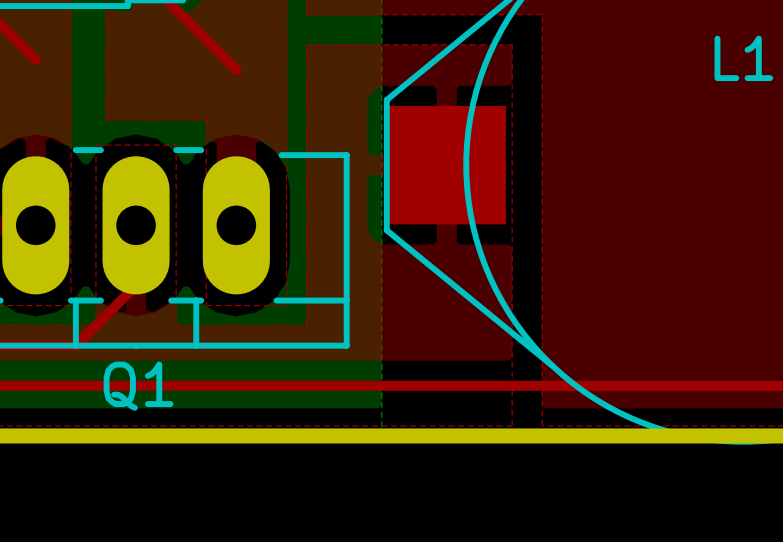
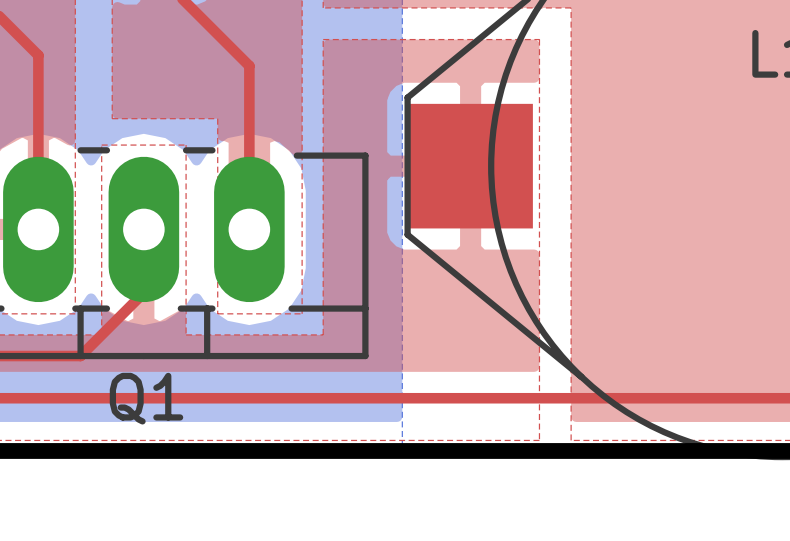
top track: none -> (38, 55) (38, 229)
top track: none -> (249, 65) (249, 229)

